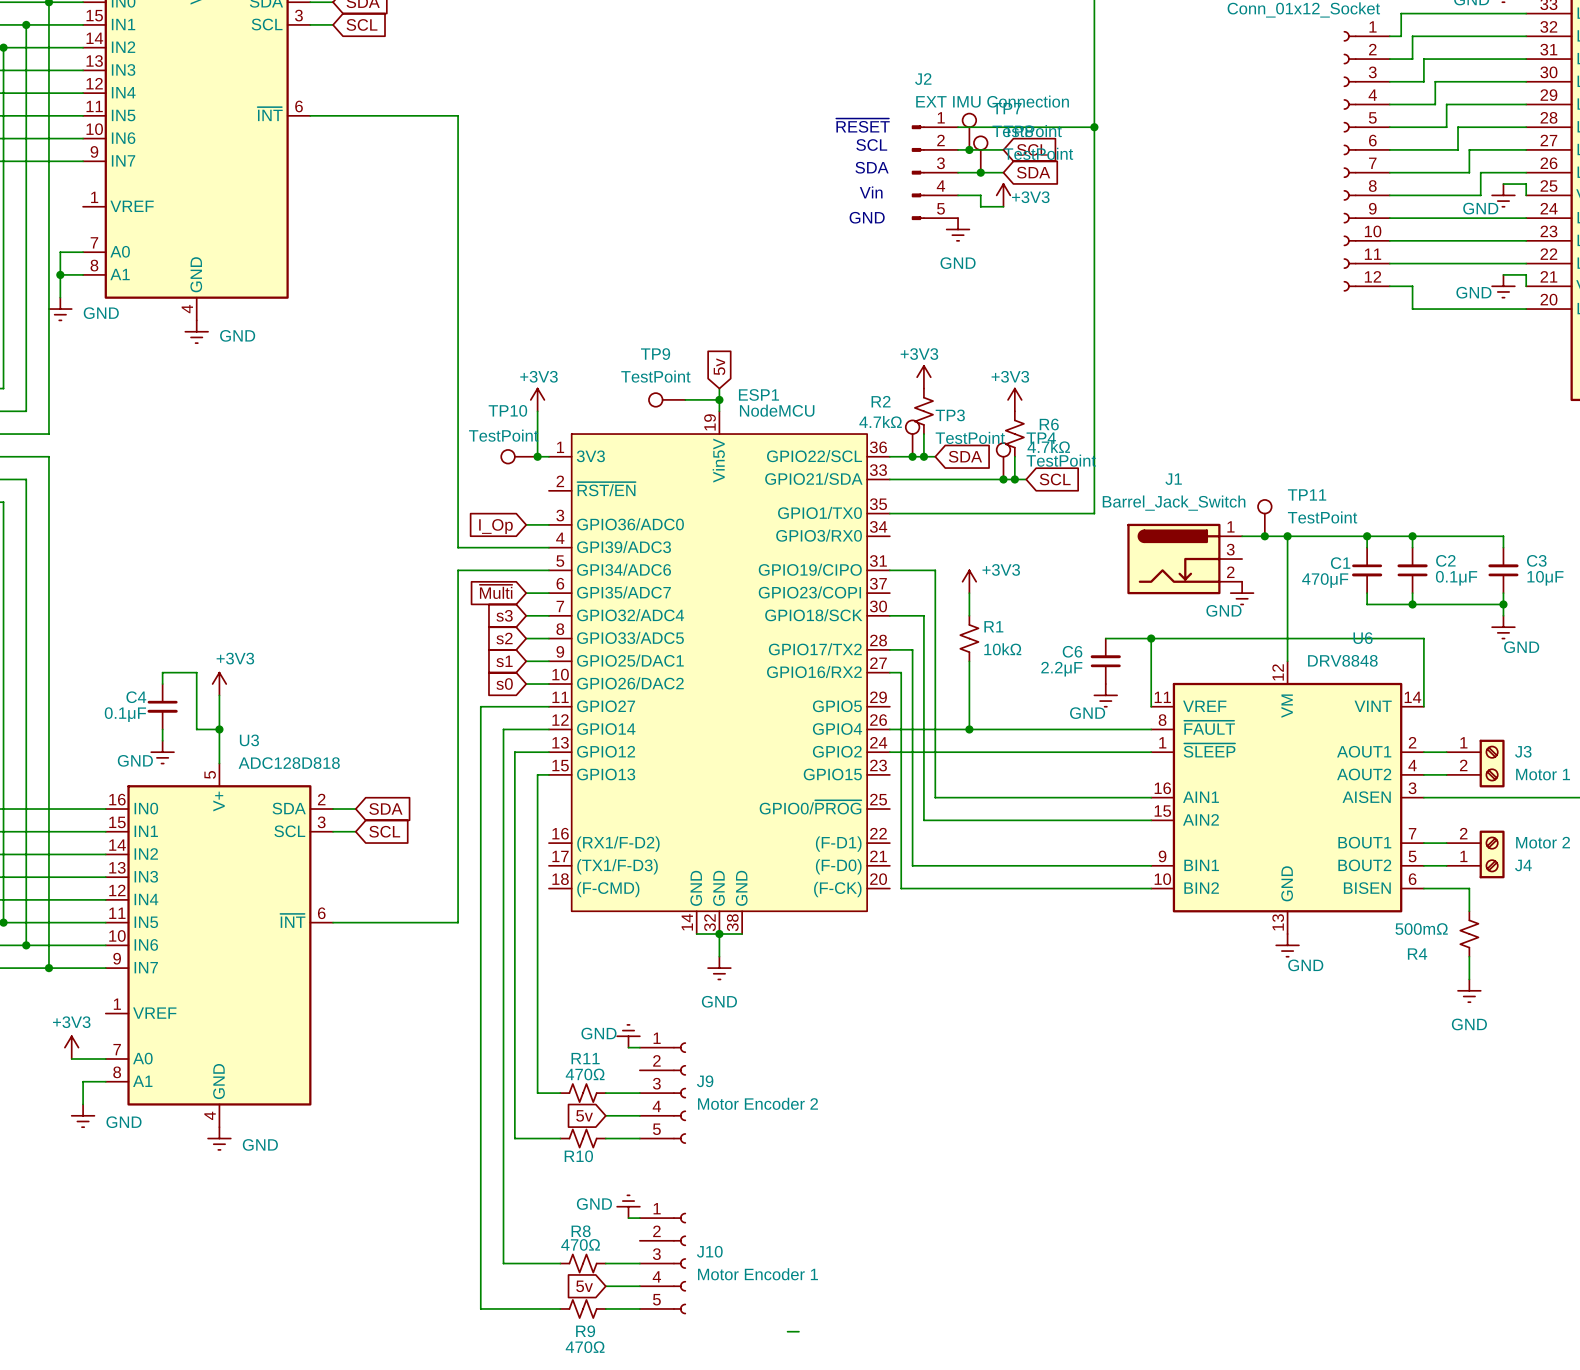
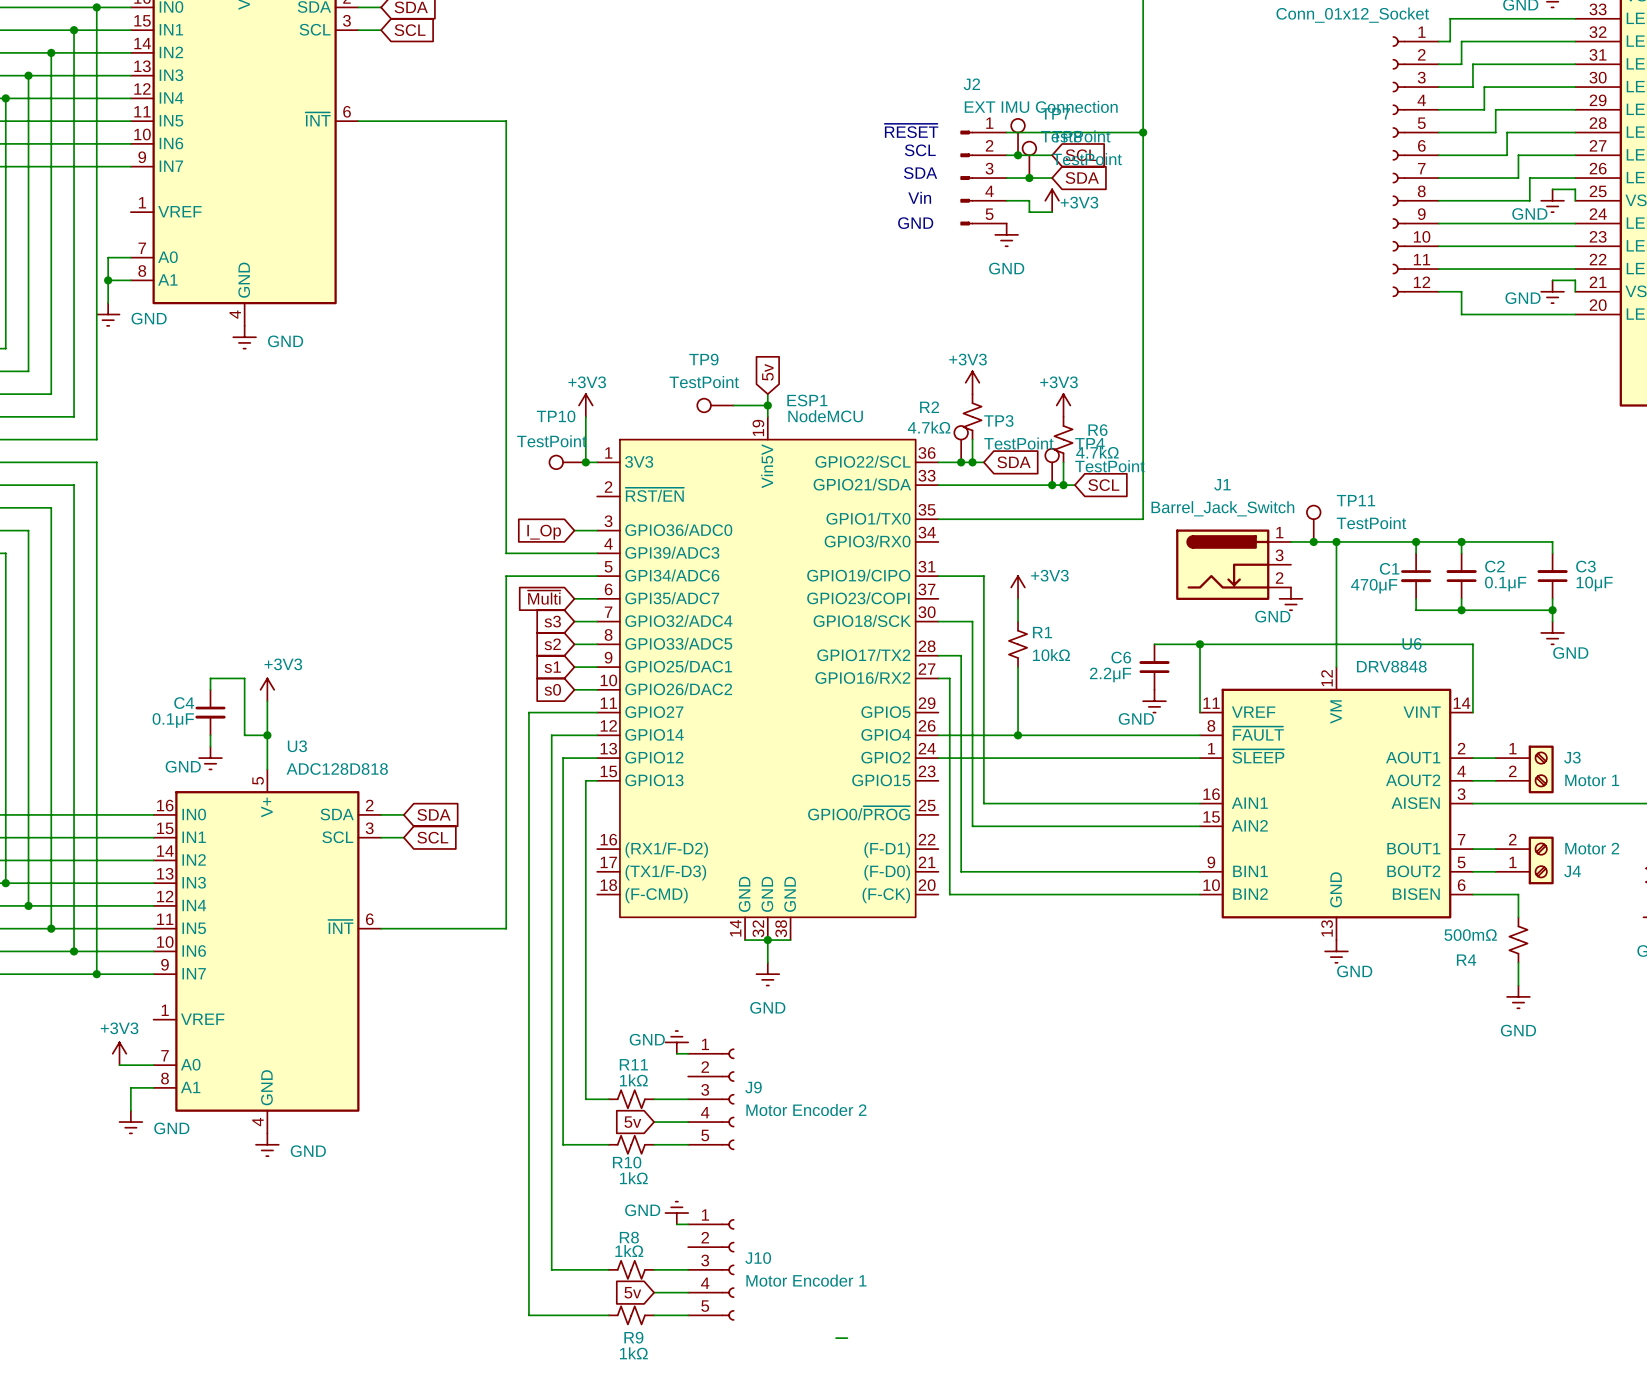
R11 value: 470Ω (585, 1074) -> 1kΩ (633, 1080)
R10 value: none -> 1kΩ (633, 1178)
R8 value: 470Ω (580, 1244) -> 1kΩ (629, 1250)
R9 value: 470Ω (585, 1347) -> 1kΩ (633, 1353)

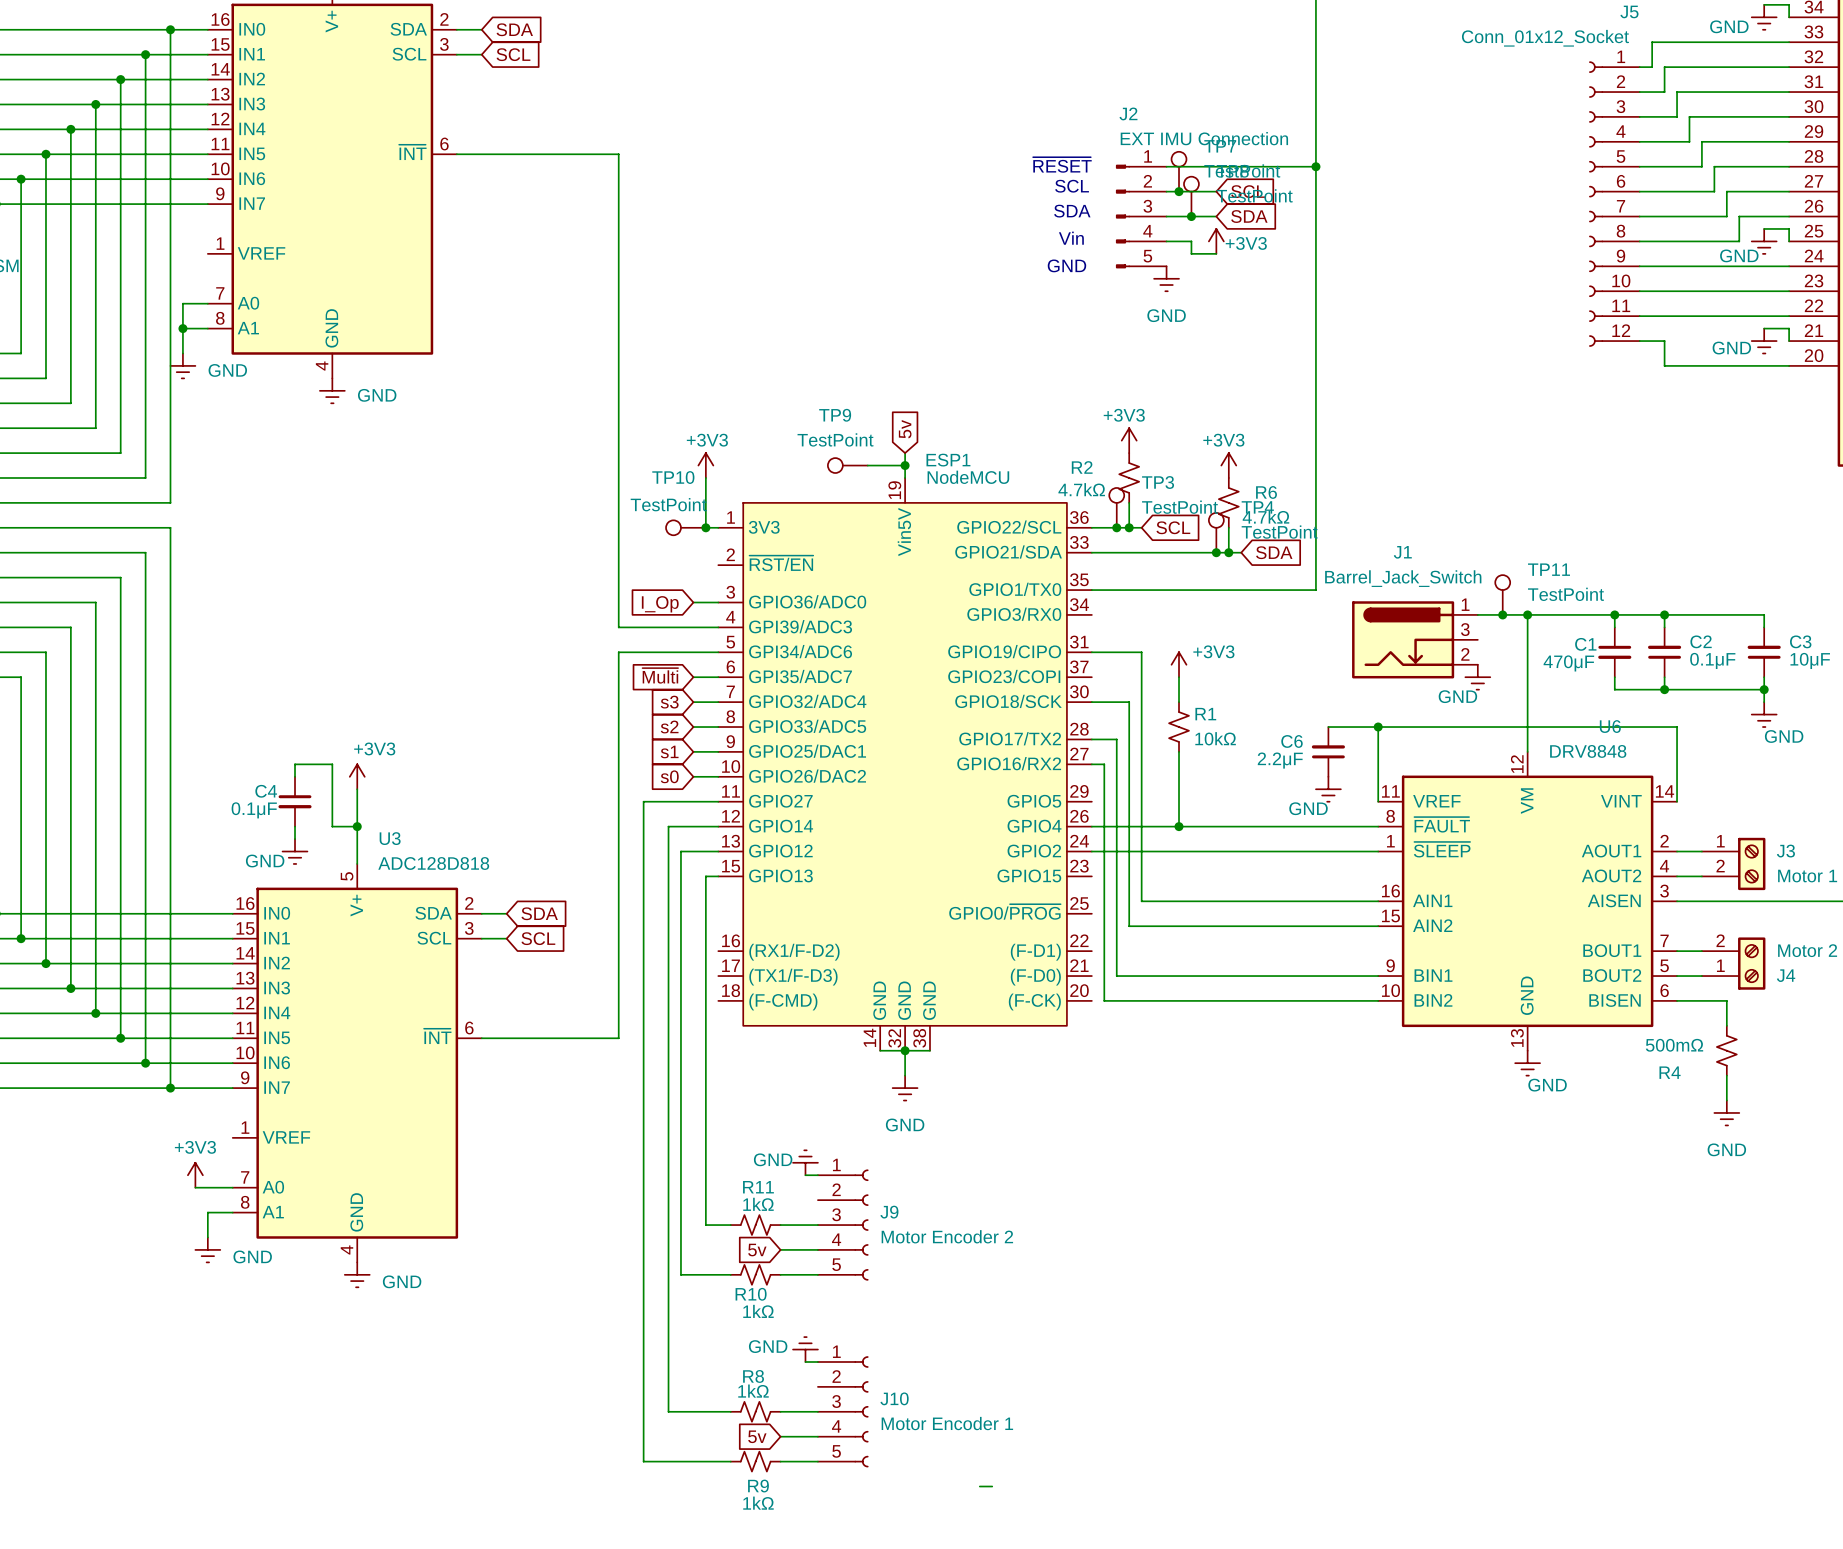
global label: SDA (1014, 462) -> SCL (1173, 527)
global label: SCL (1103, 485) -> SDA (1274, 552)

